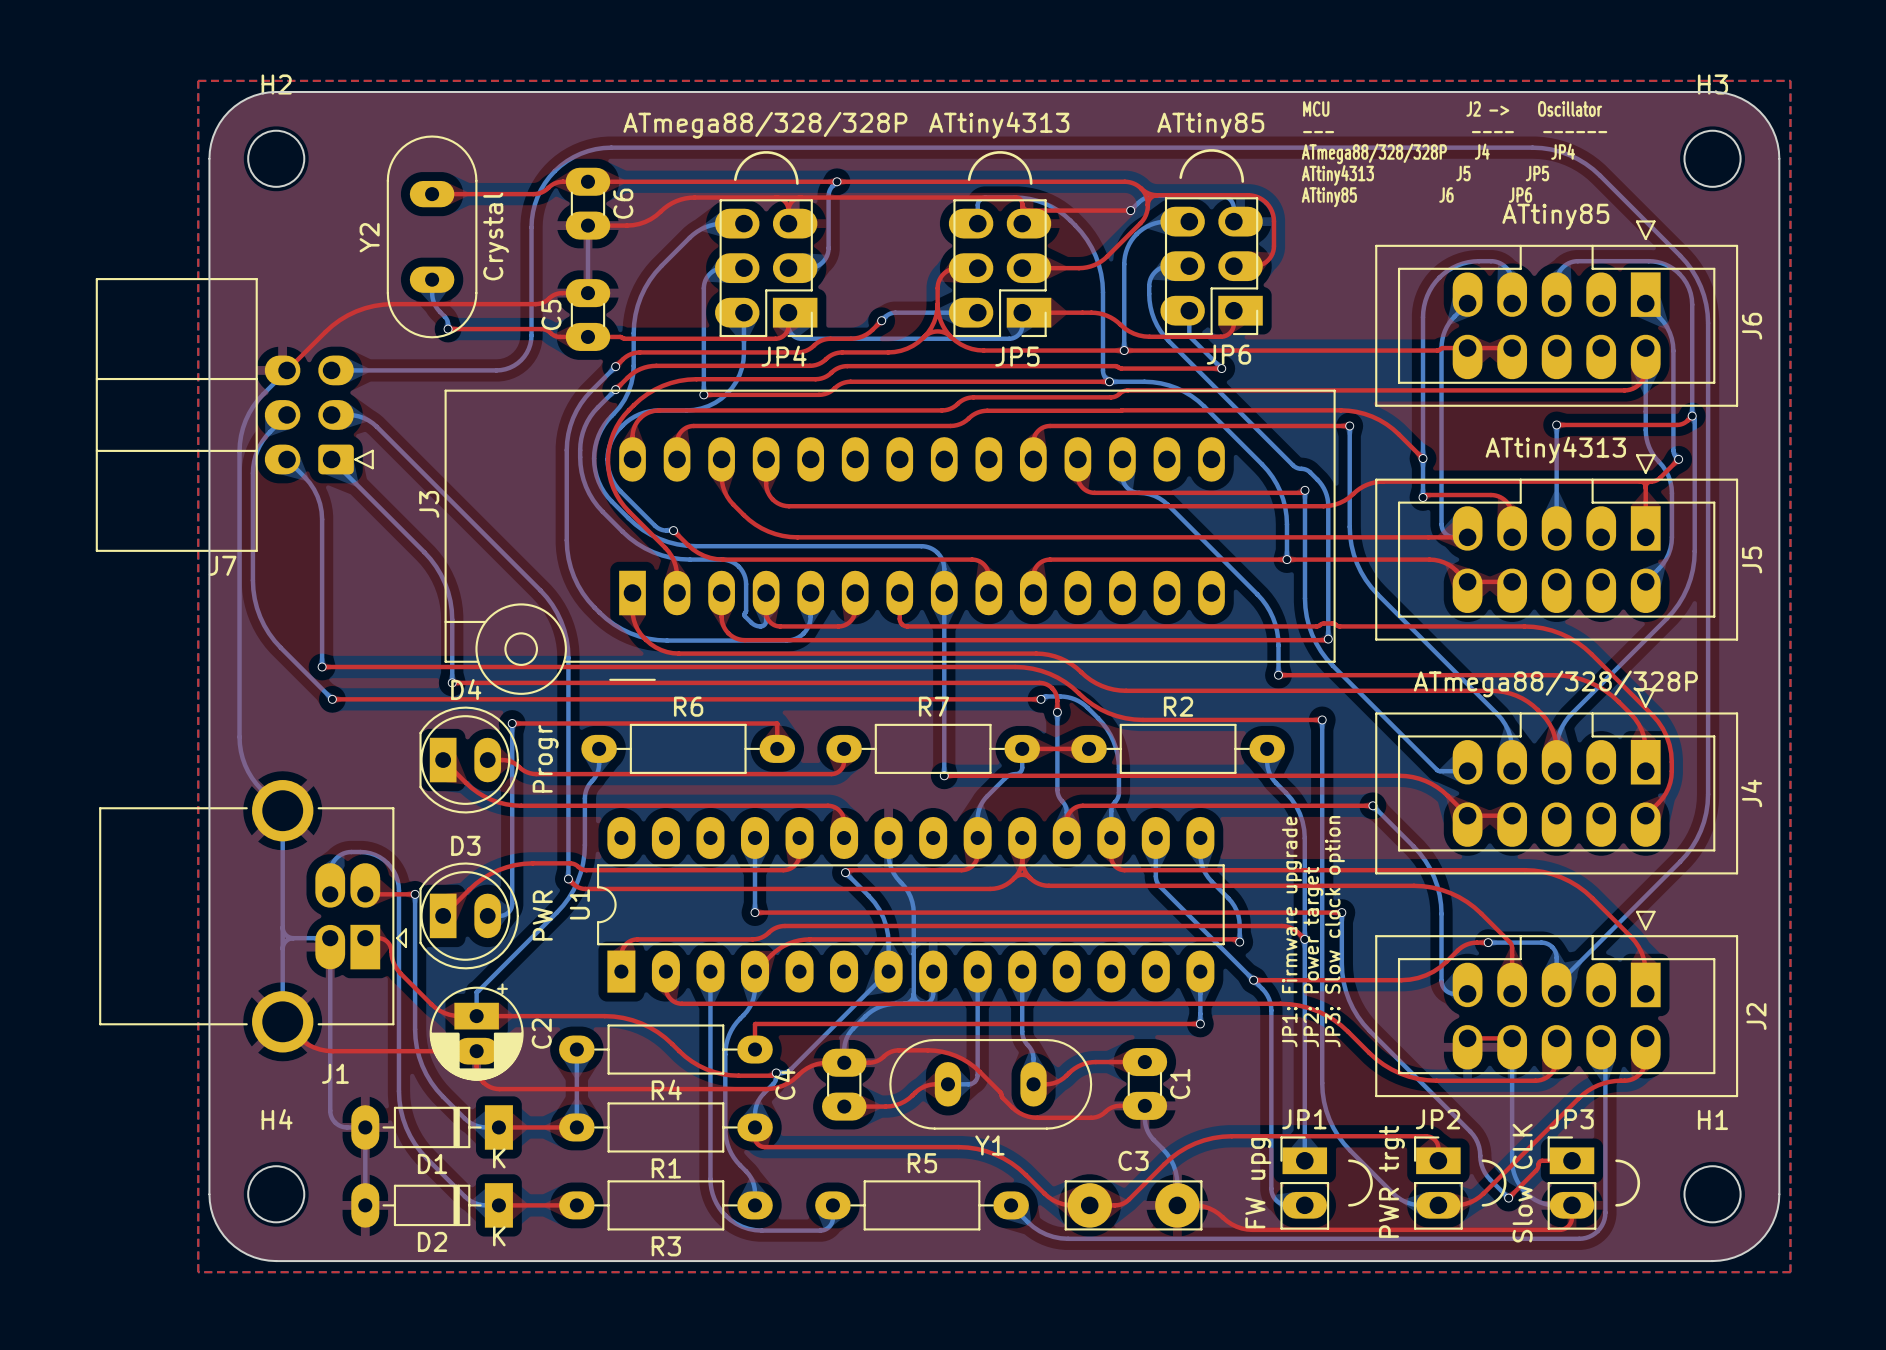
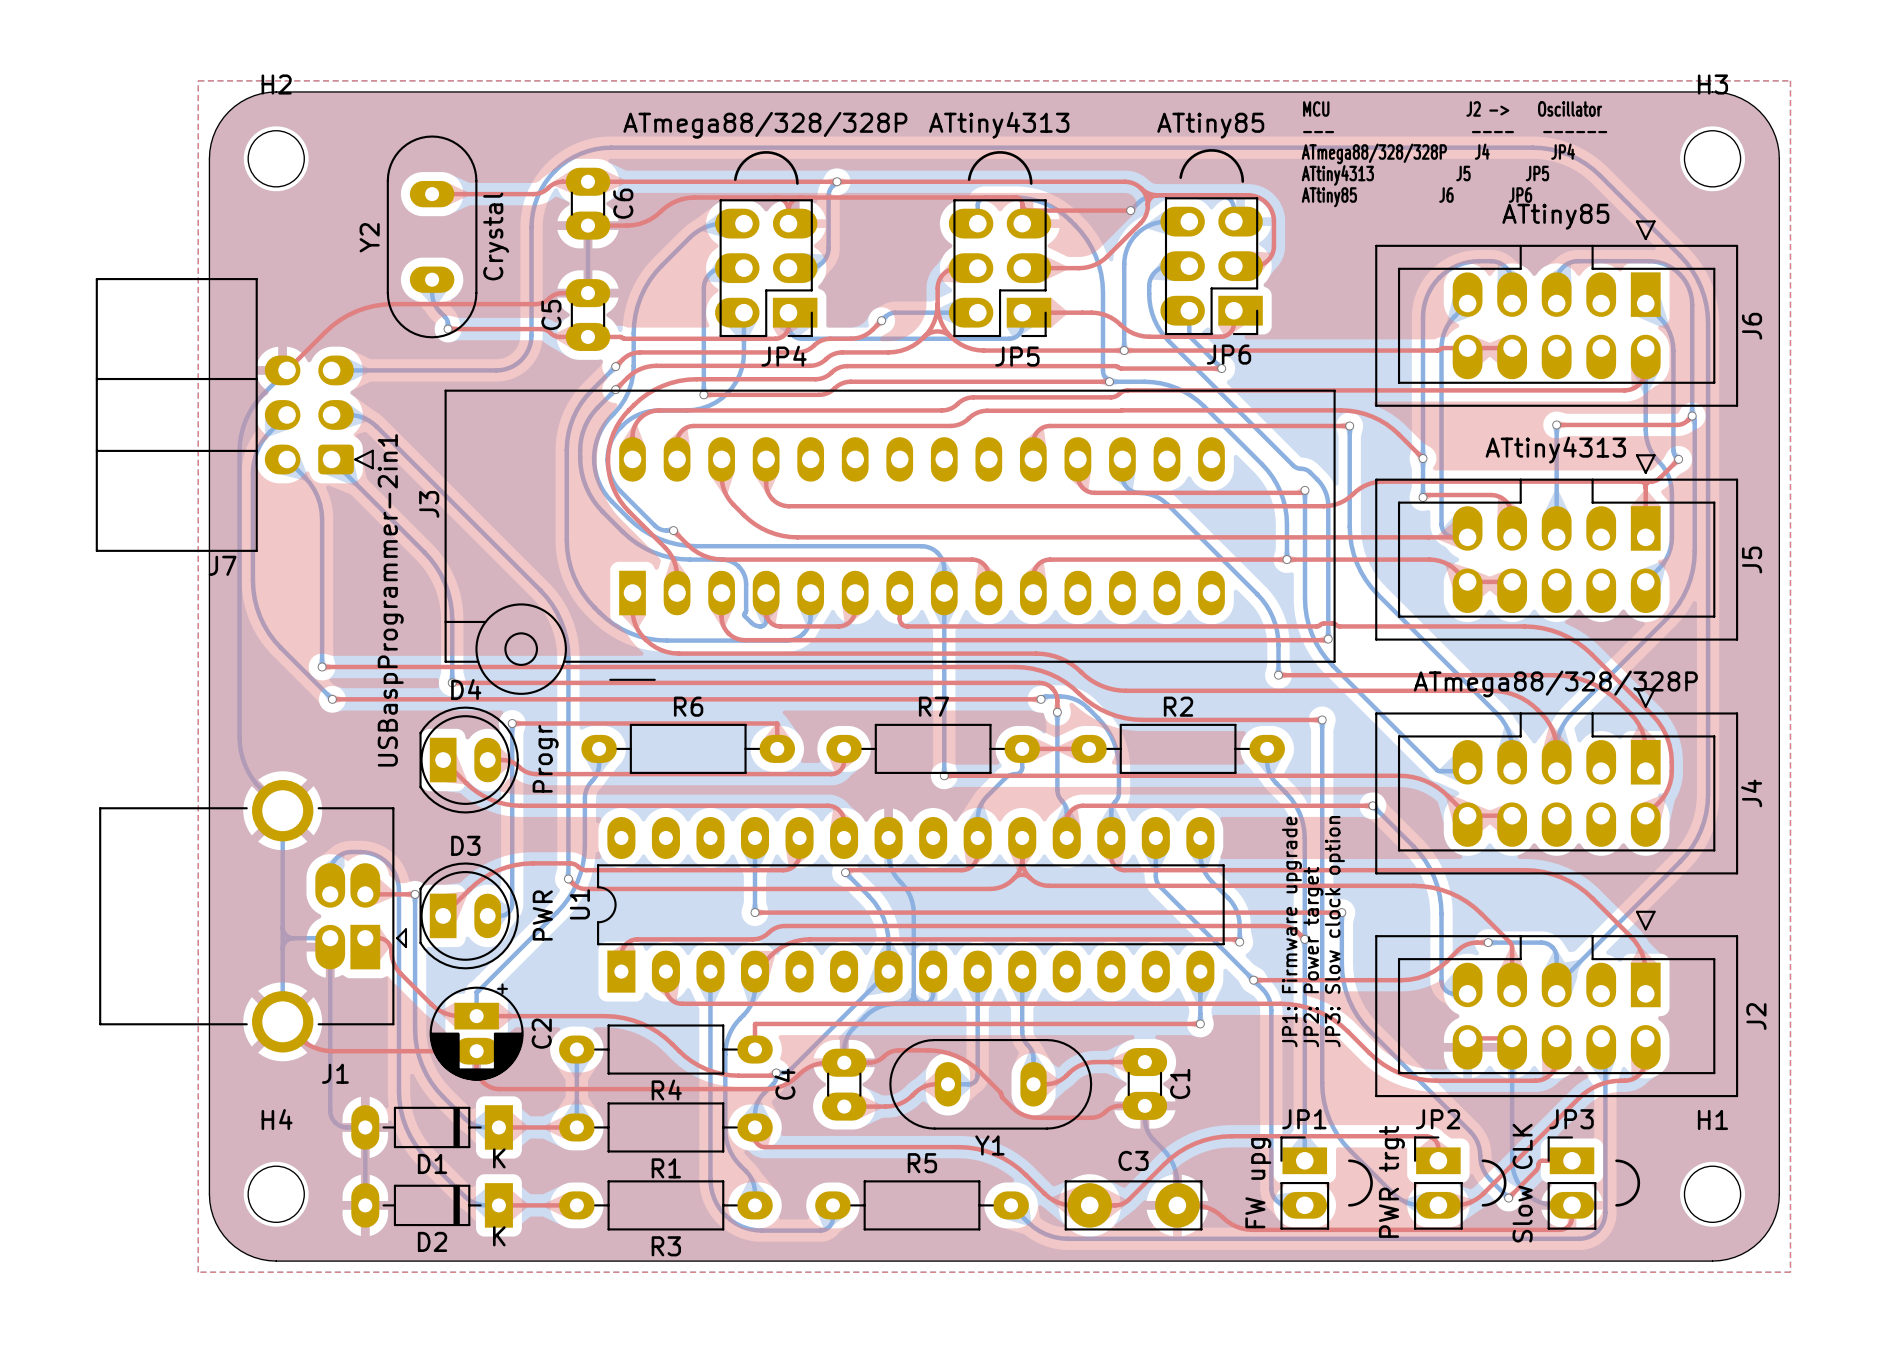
text: none -> USBaspProgrammer-2in1 (390, 600)

